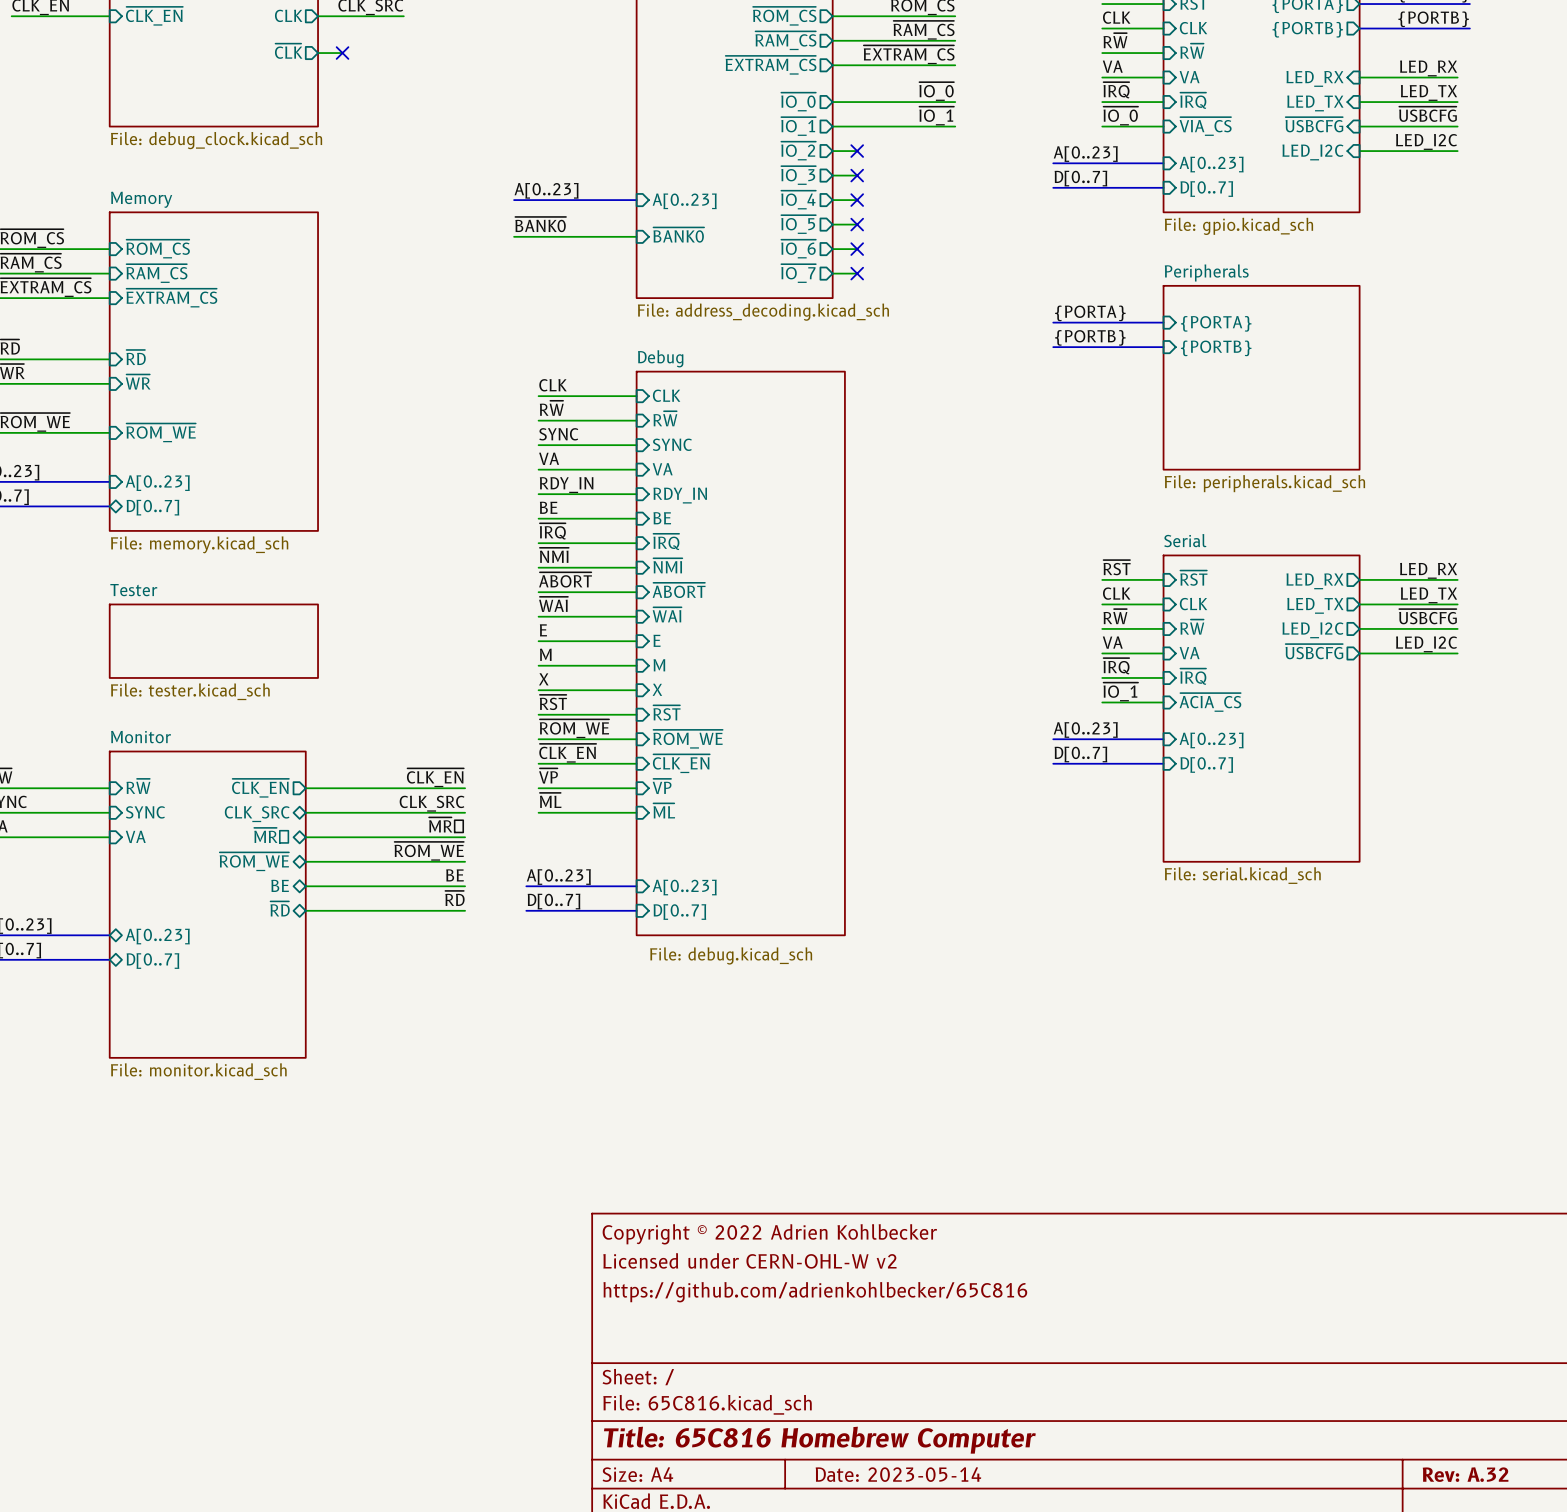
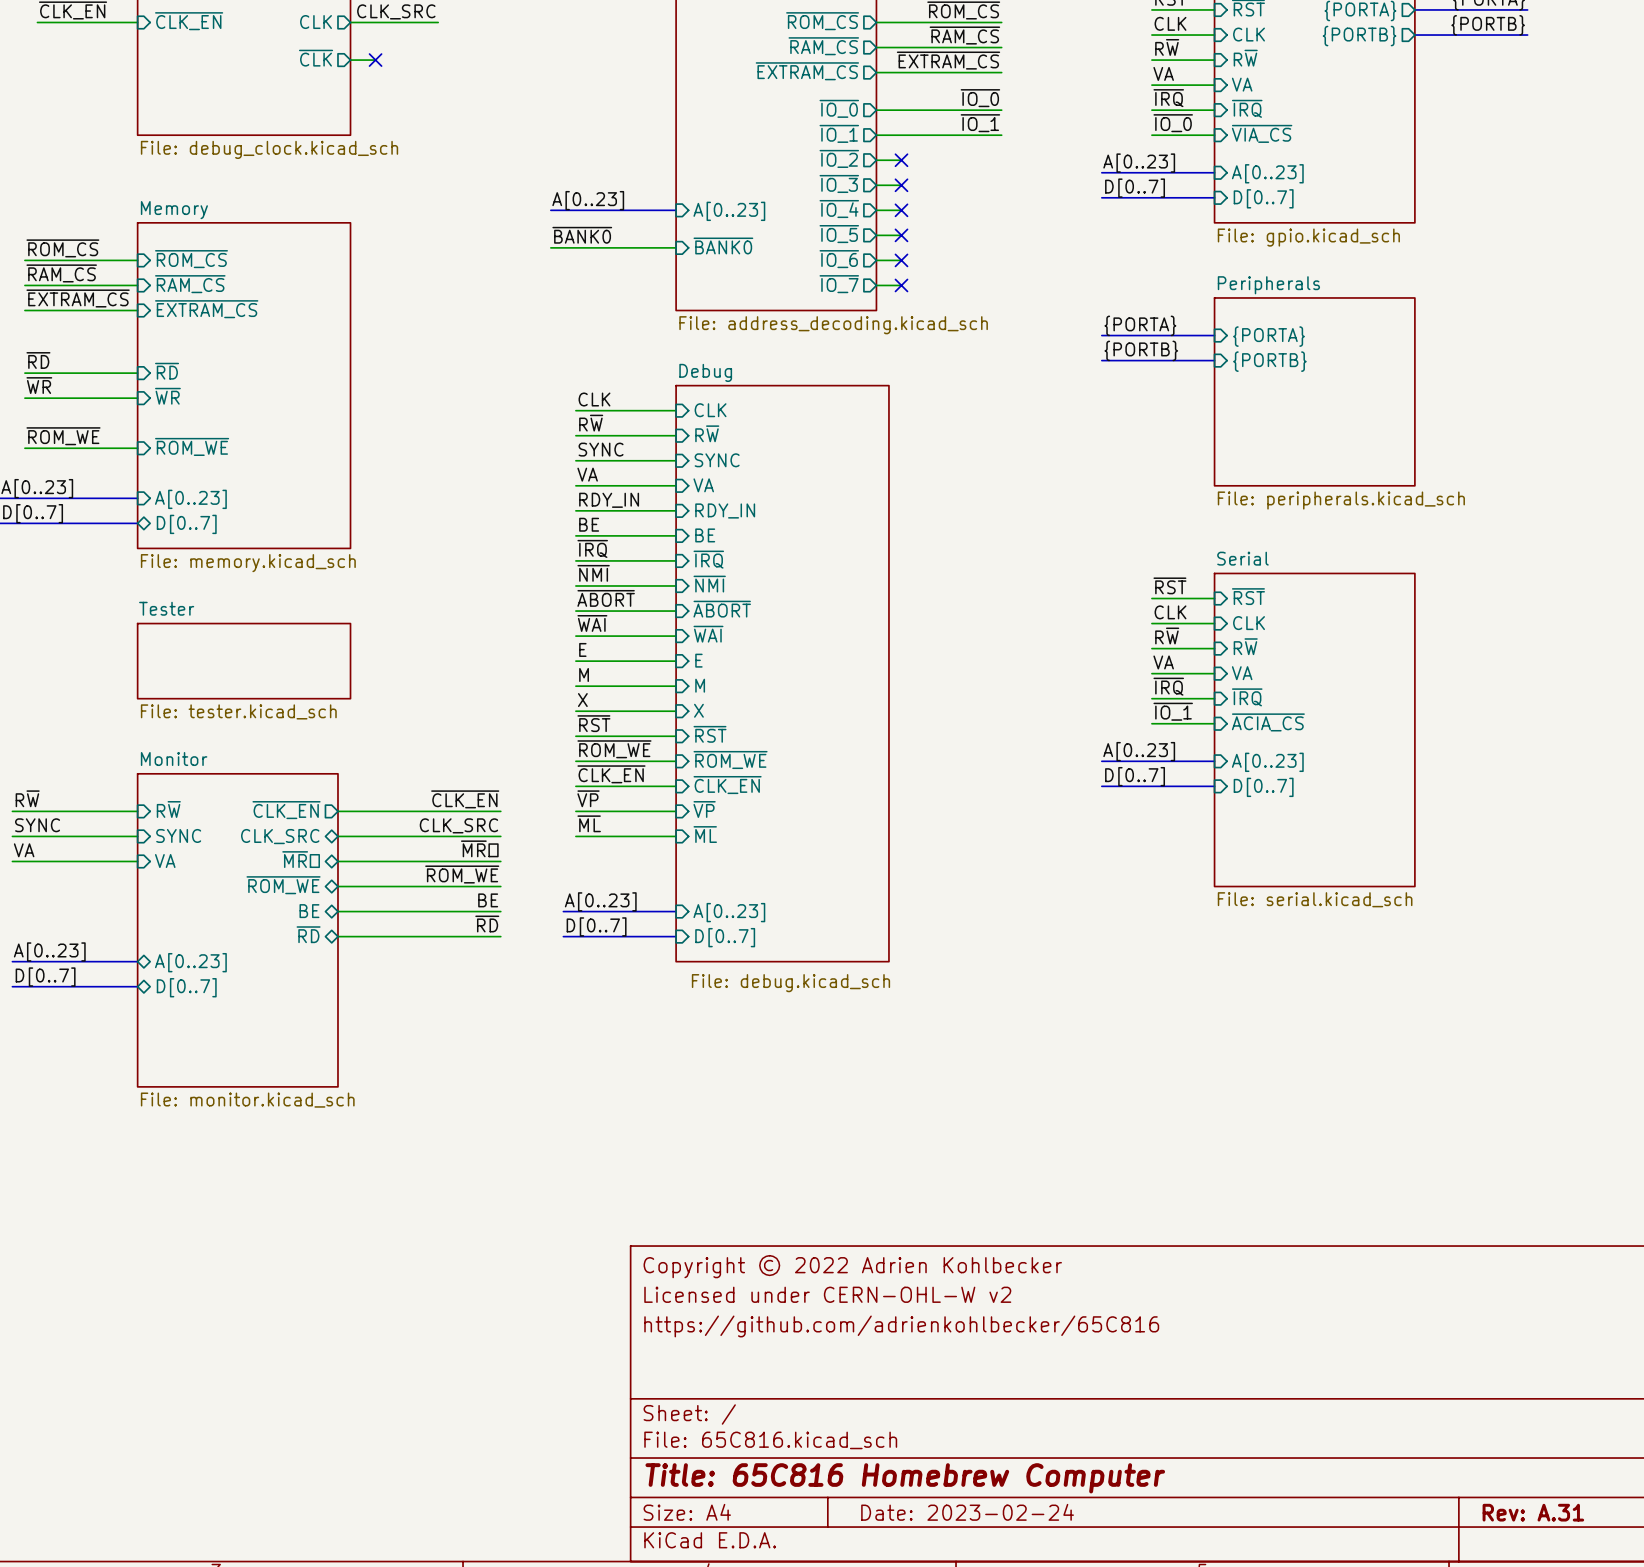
label: LED_RX (1428, 68) -> none
wire: (1359, 77) (1457, 77) -> none
sheet pin: LED_RX (1315, 78) -> none
label: LED_TX (1429, 92) -> none
wire: (1359, 102) (1457, 102) -> none
sheet pin: LED_TX (1315, 103) -> none
label: ~{USBCFG} (1428, 114) -> none
sheet pin: ~{USBCFG} (1314, 124) -> none
wire: (1359, 126) (1457, 126) -> none
label: LED_I2C (1426, 141) -> none
wire: (1359, 151) (1457, 151) -> none
sheet pin: LED_I2C (1312, 152) -> none
label: LED_RX (1428, 570) -> none
wire: (1359, 579) (1457, 579) -> none
sheet pin: LED_RX (1315, 581) -> none
label: LED_TX (1429, 595) -> none
wire: (1359, 604) (1457, 604) -> none
sheet pin: LED_TX (1315, 605) -> none
label: ~{USBCFG} (1428, 616) -> none
wire: (1359, 628) (1457, 628) -> none
sheet pin: LED_I2C (1312, 630) -> none
label: LED_I2C (1426, 644) -> none
sheet pin: ~{USBCFG} (1314, 651) -> none
wire: (1359, 653) (1457, 653) -> none
title block: Date: 2023-05-14 (898, 1474) -> Date: 2023-02-24 (967, 1512)
title block: Rev: A.32 (1465, 1474) -> Rev: A.31 (1533, 1512)

